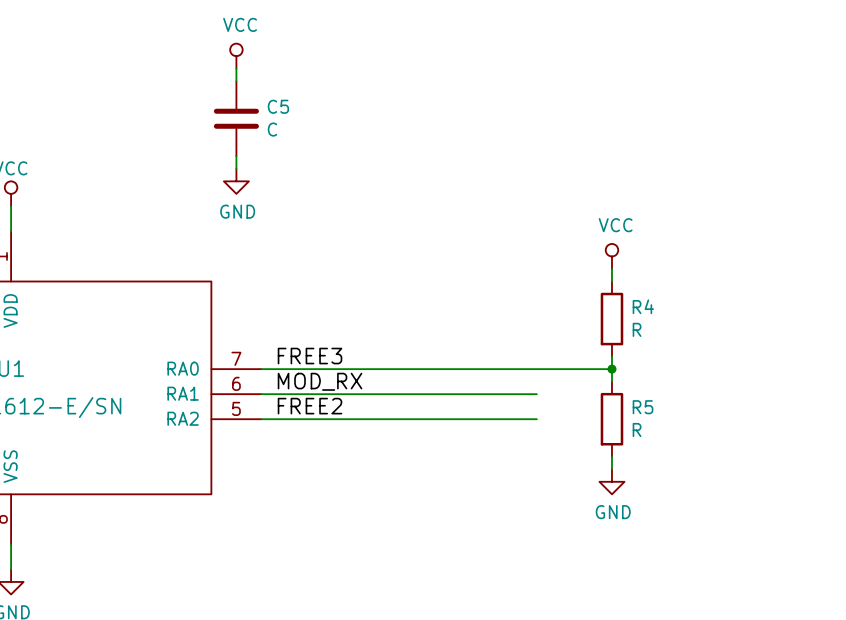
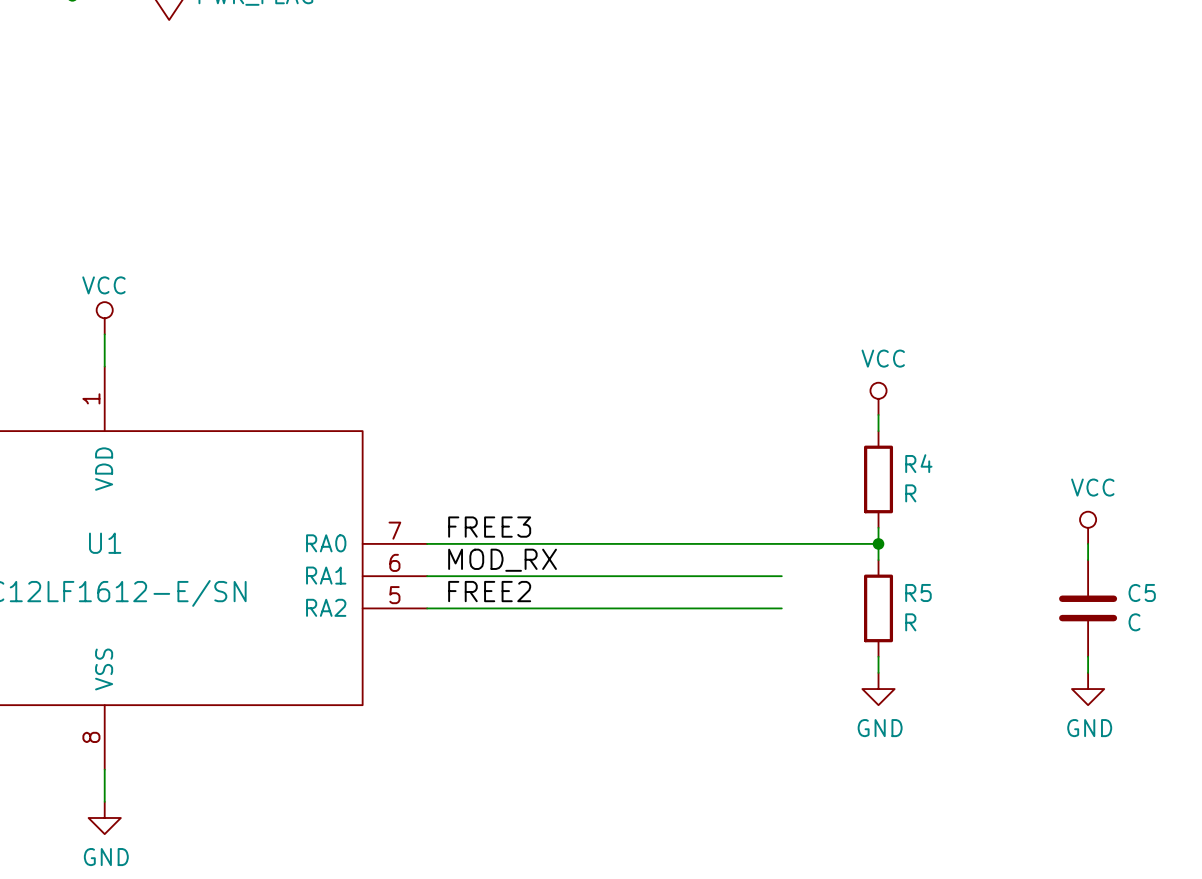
power symbol: VCC (236, 56) -> none
wire: (236, 68) (236, 81) -> none
C5 position: (236, 118) -> (1088, 608)
wire: (236, 156) (236, 168) -> none
power symbol: GND (236, 181) -> none
power symbol: none -> VCC (1088, 527)
wire: none -> (1088, 543) (1088, 560)
wire: none -> (1088, 656) (1088, 672)
power symbol: none -> GND (1088, 689)

